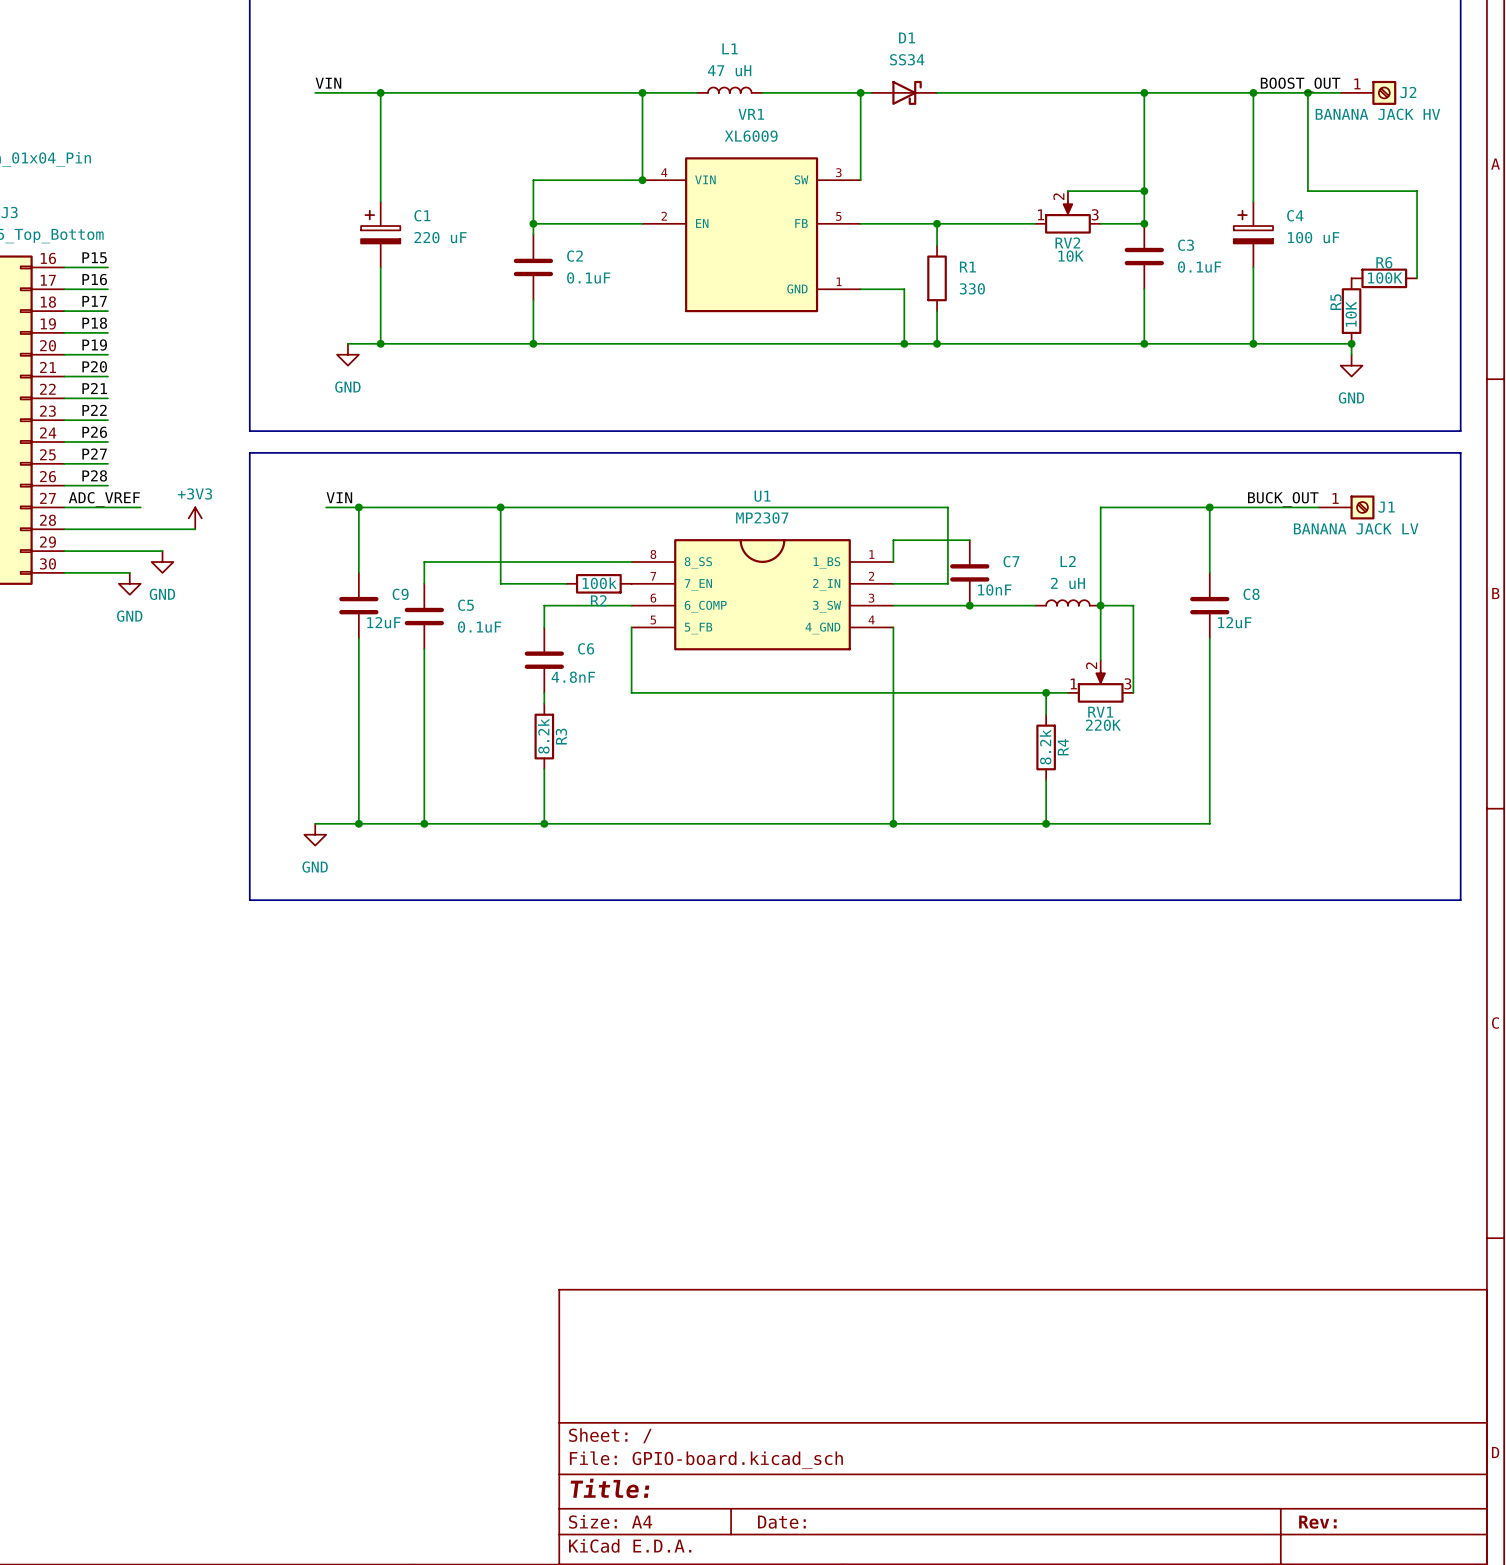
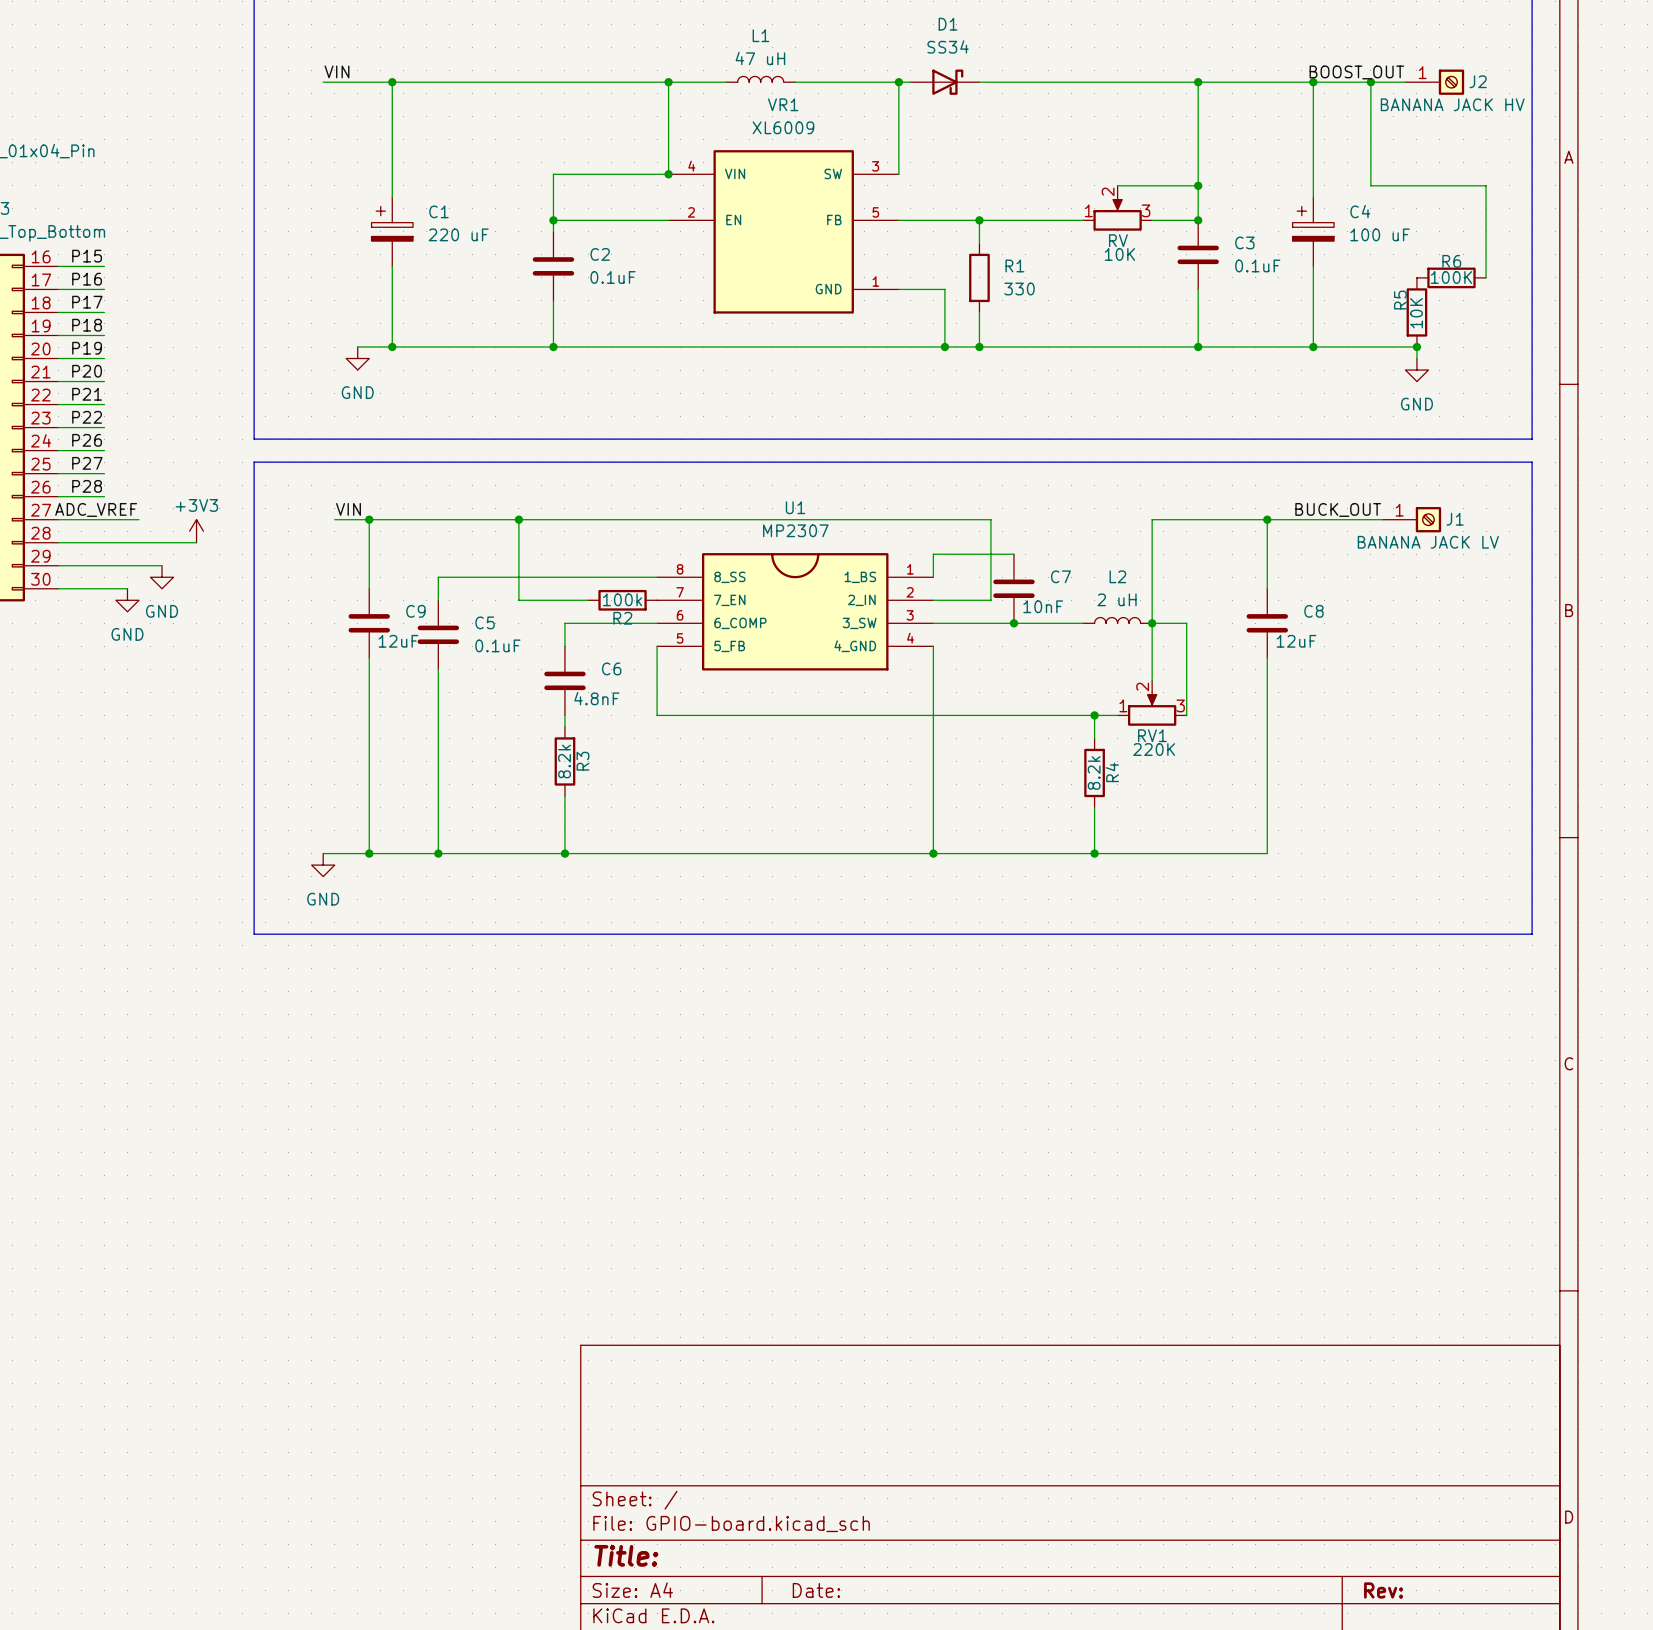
RV2 name: RV2 (1067, 242) -> RV (1118, 240)

